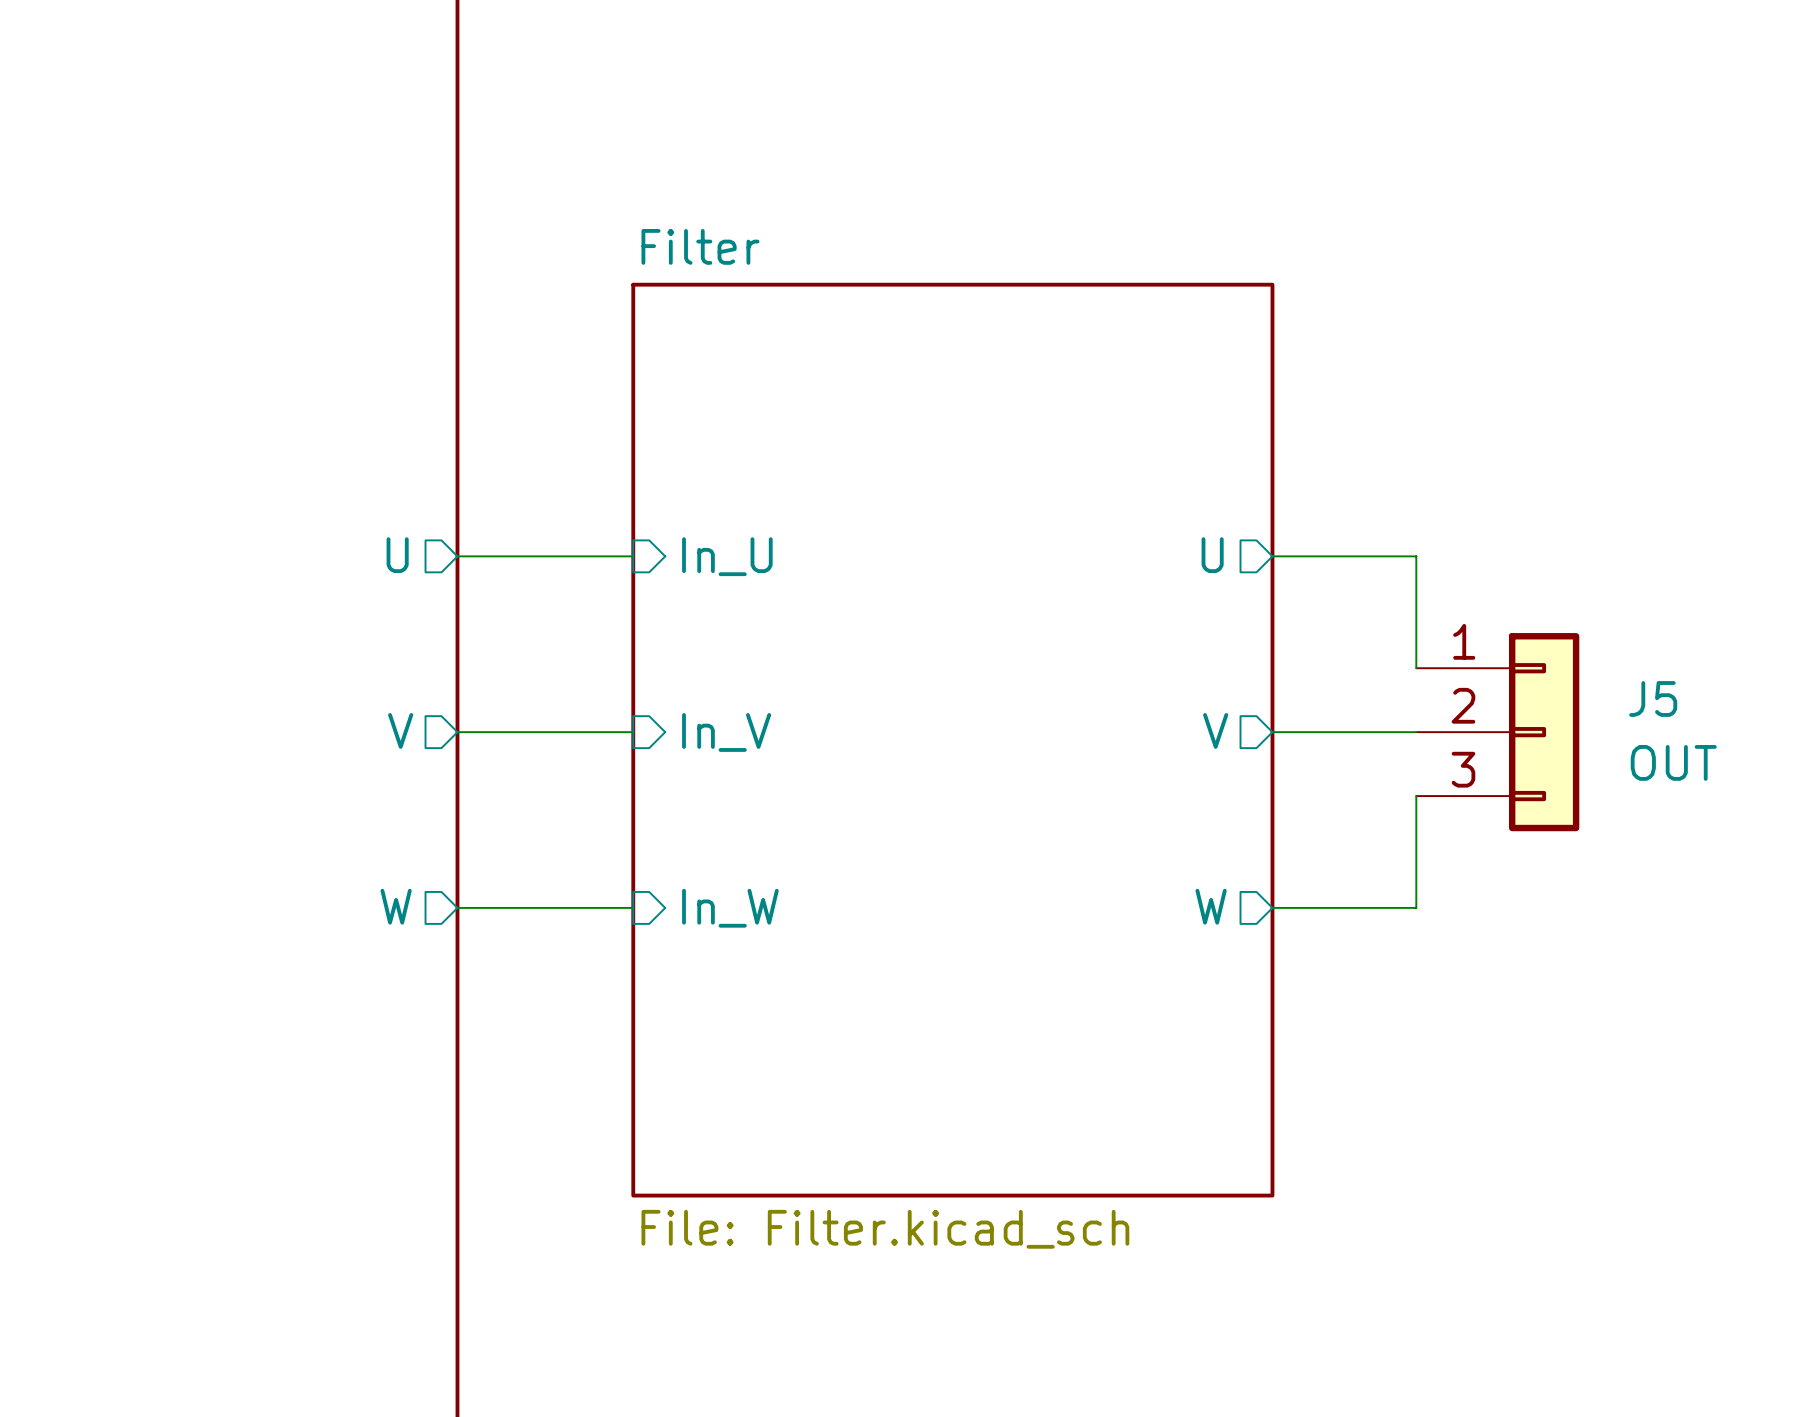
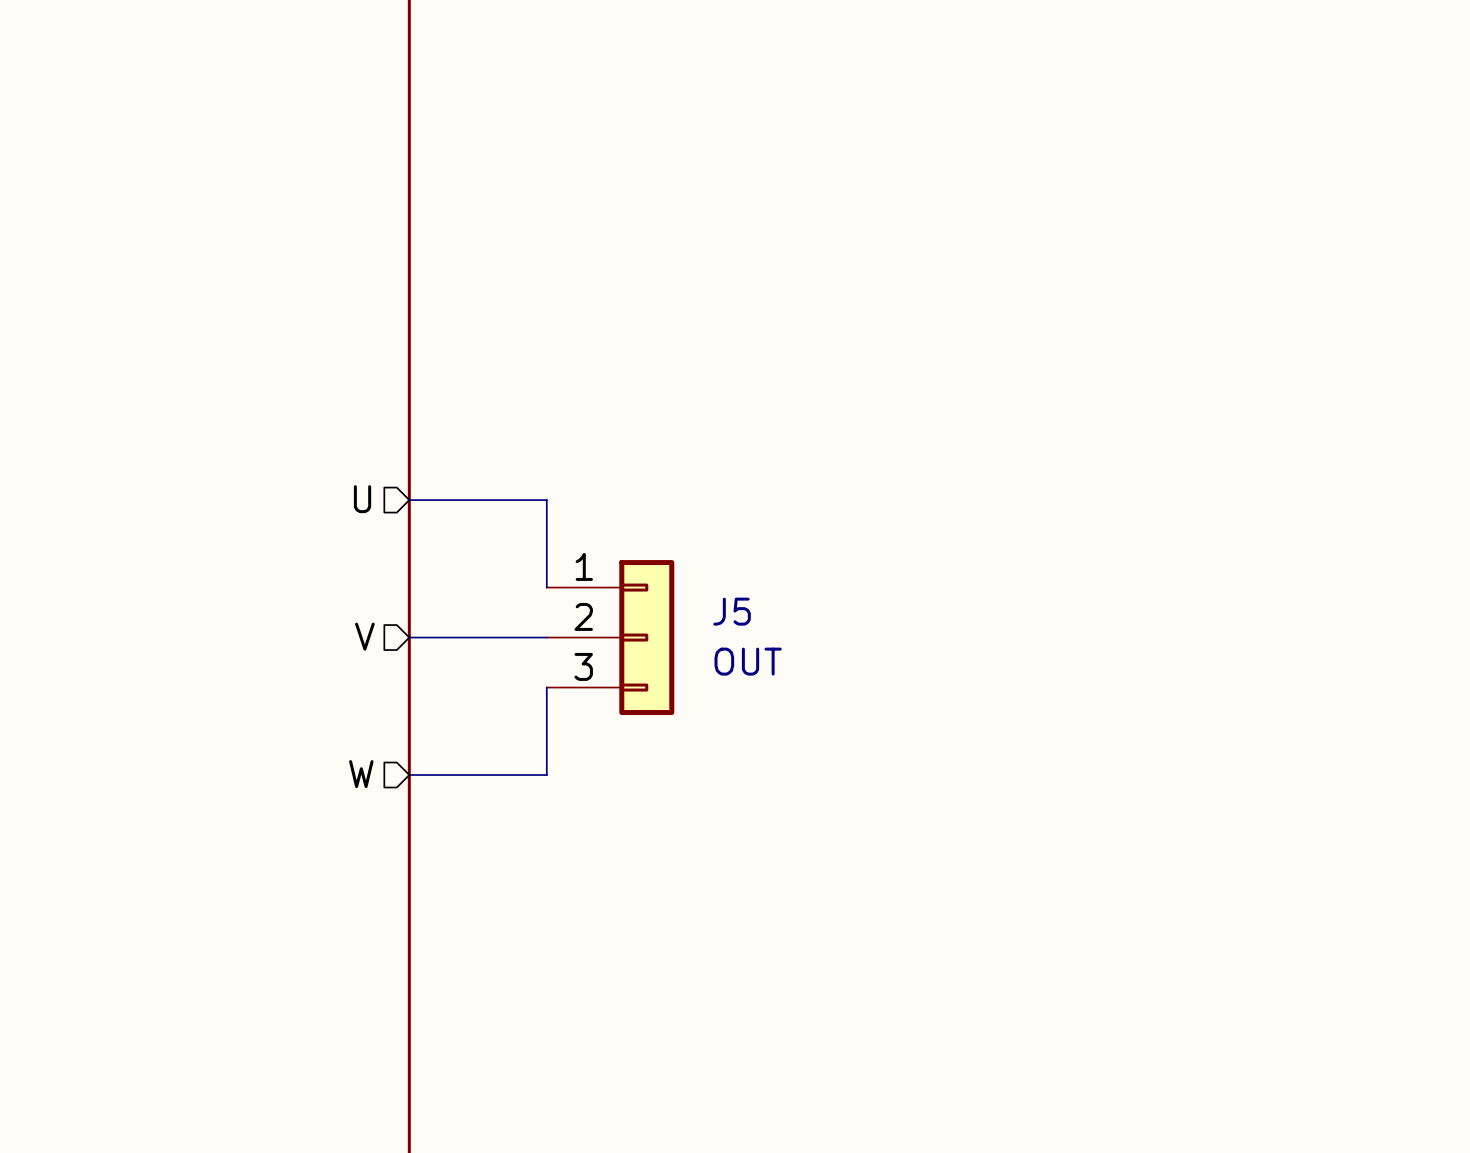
sheet pin: U (1212, 555) -> none
sheet pin: In_U (727, 556) -> none
wire: (1272, 556) (1416, 556) (1416, 668) -> none
sheet pin: V (1215, 730) -> none
sheet pin: In_V (726, 732) -> none
wire: (1272, 732) (1416, 732) -> none
J5 position: (1497, 732) -> (610, 637)
sheet Filter: File: Filter.kicad_sch (952, 740) -> none
wire: (1416, 796) (1416, 907) (1272, 907) -> none
sheet pin: W (1211, 906) -> none
sheet pin: In_W (730, 908) -> none

